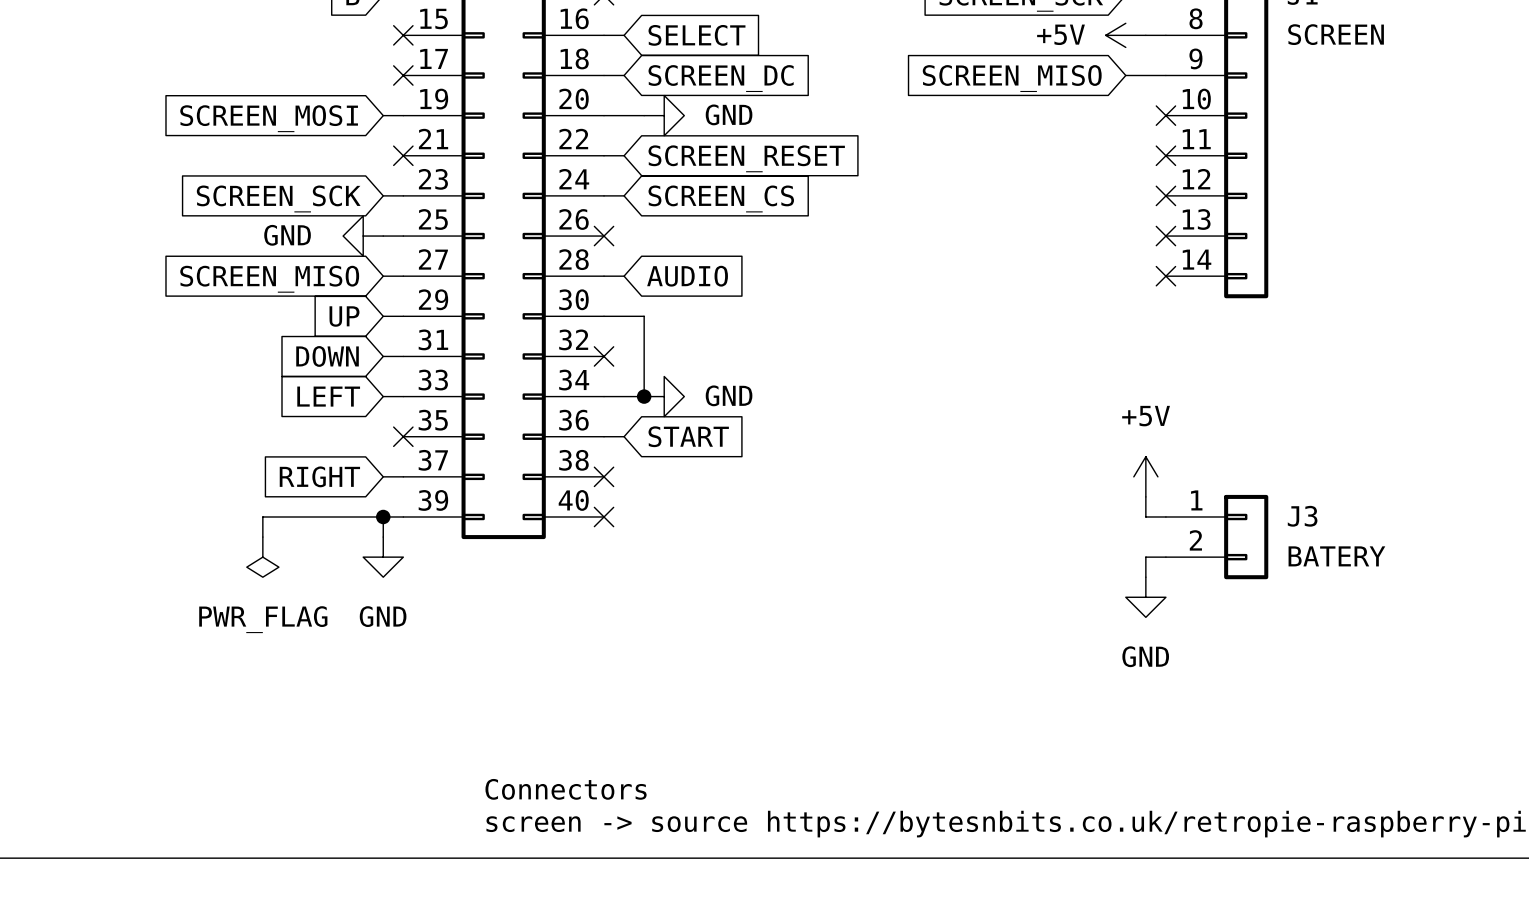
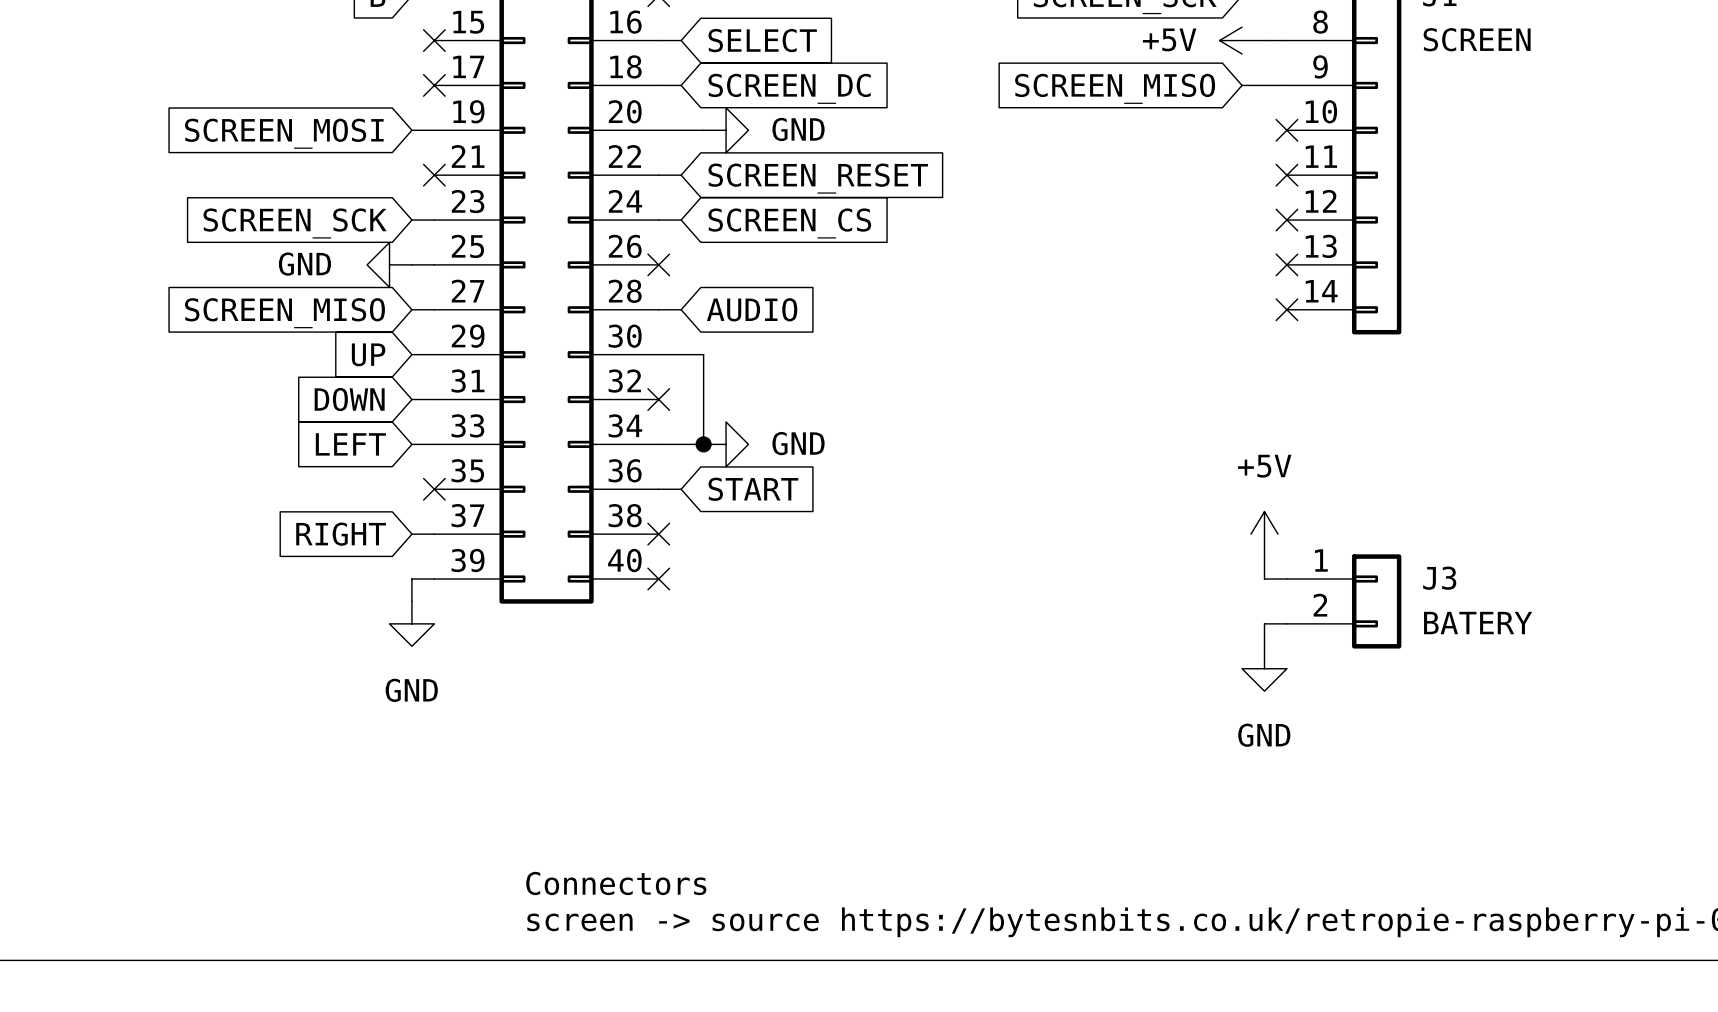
wire: (383, 516) (262, 516) (262, 537) -> none
junction: (383, 516) -> none
power symbol: PWR_FLAG (262, 557) -> none

